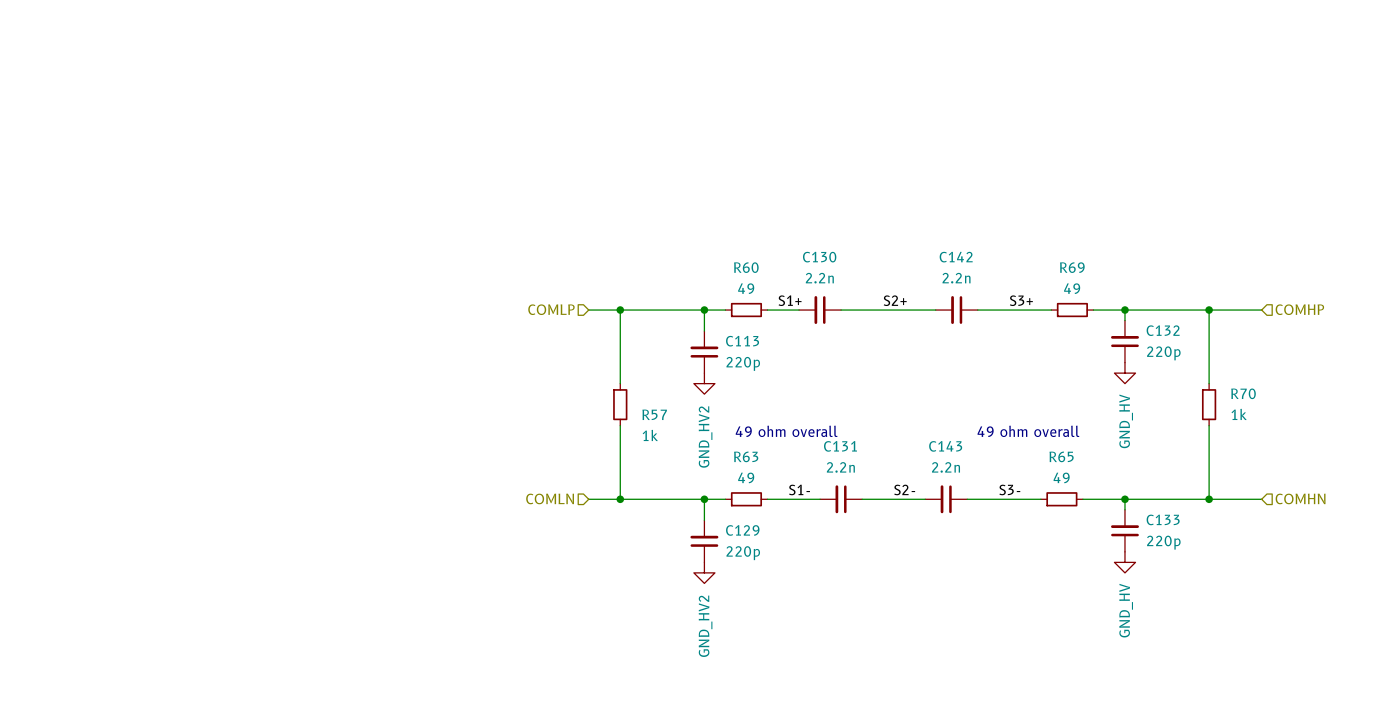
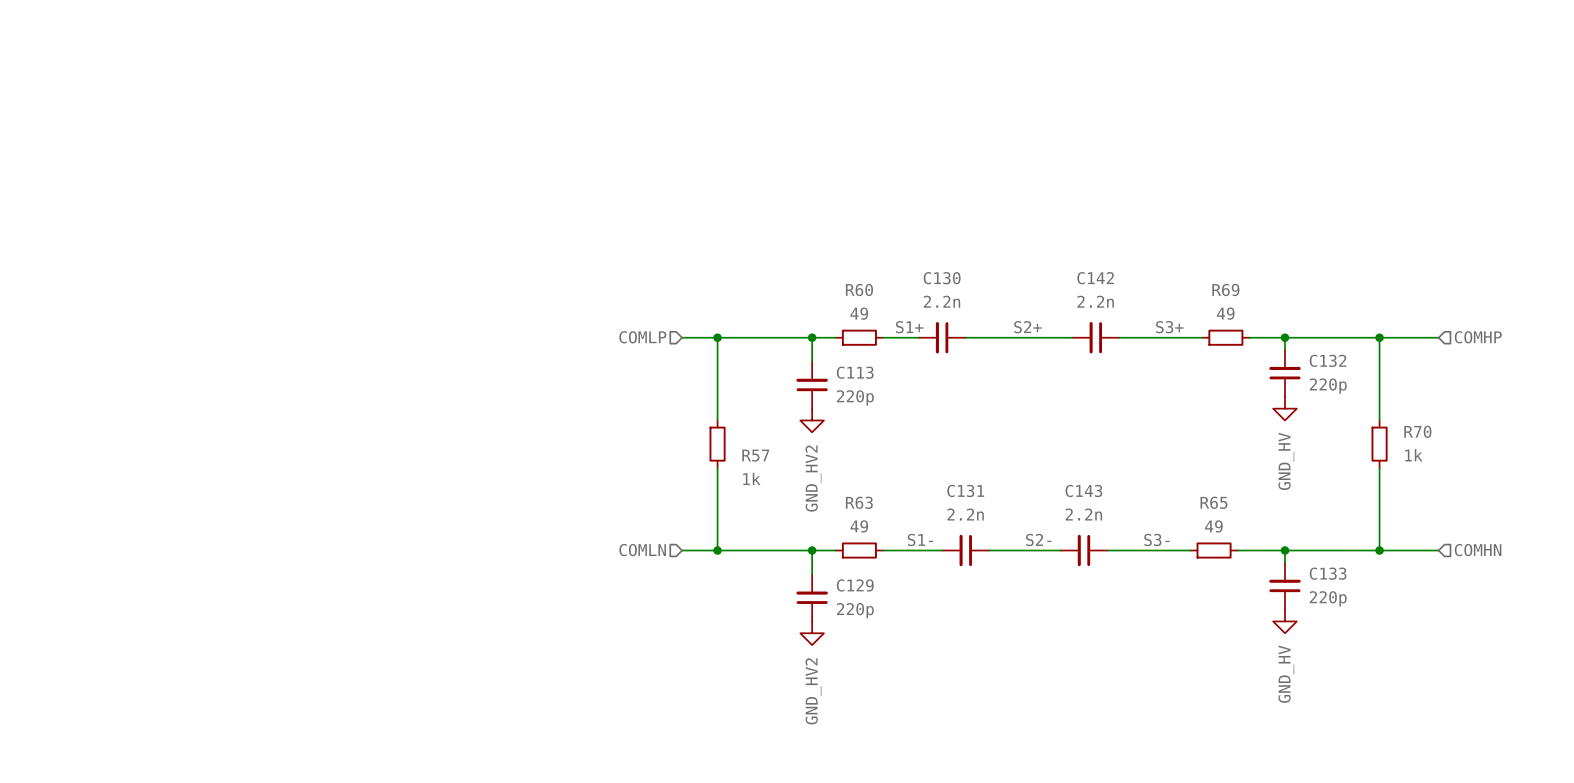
text: 49 ohm overall (786, 431) -> none
text: 49 ohm overall (1028, 431) -> none

